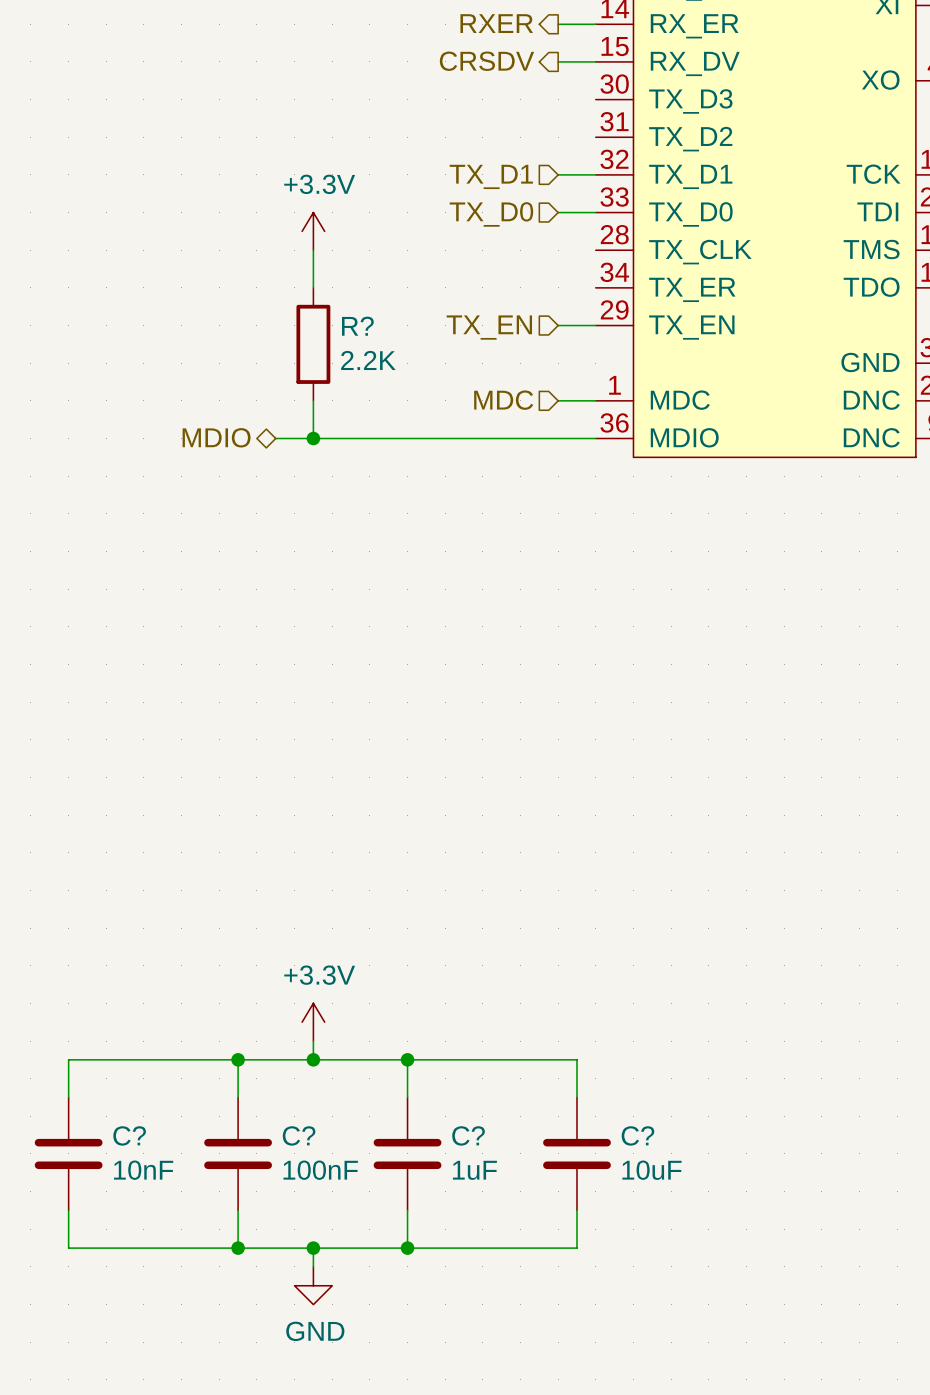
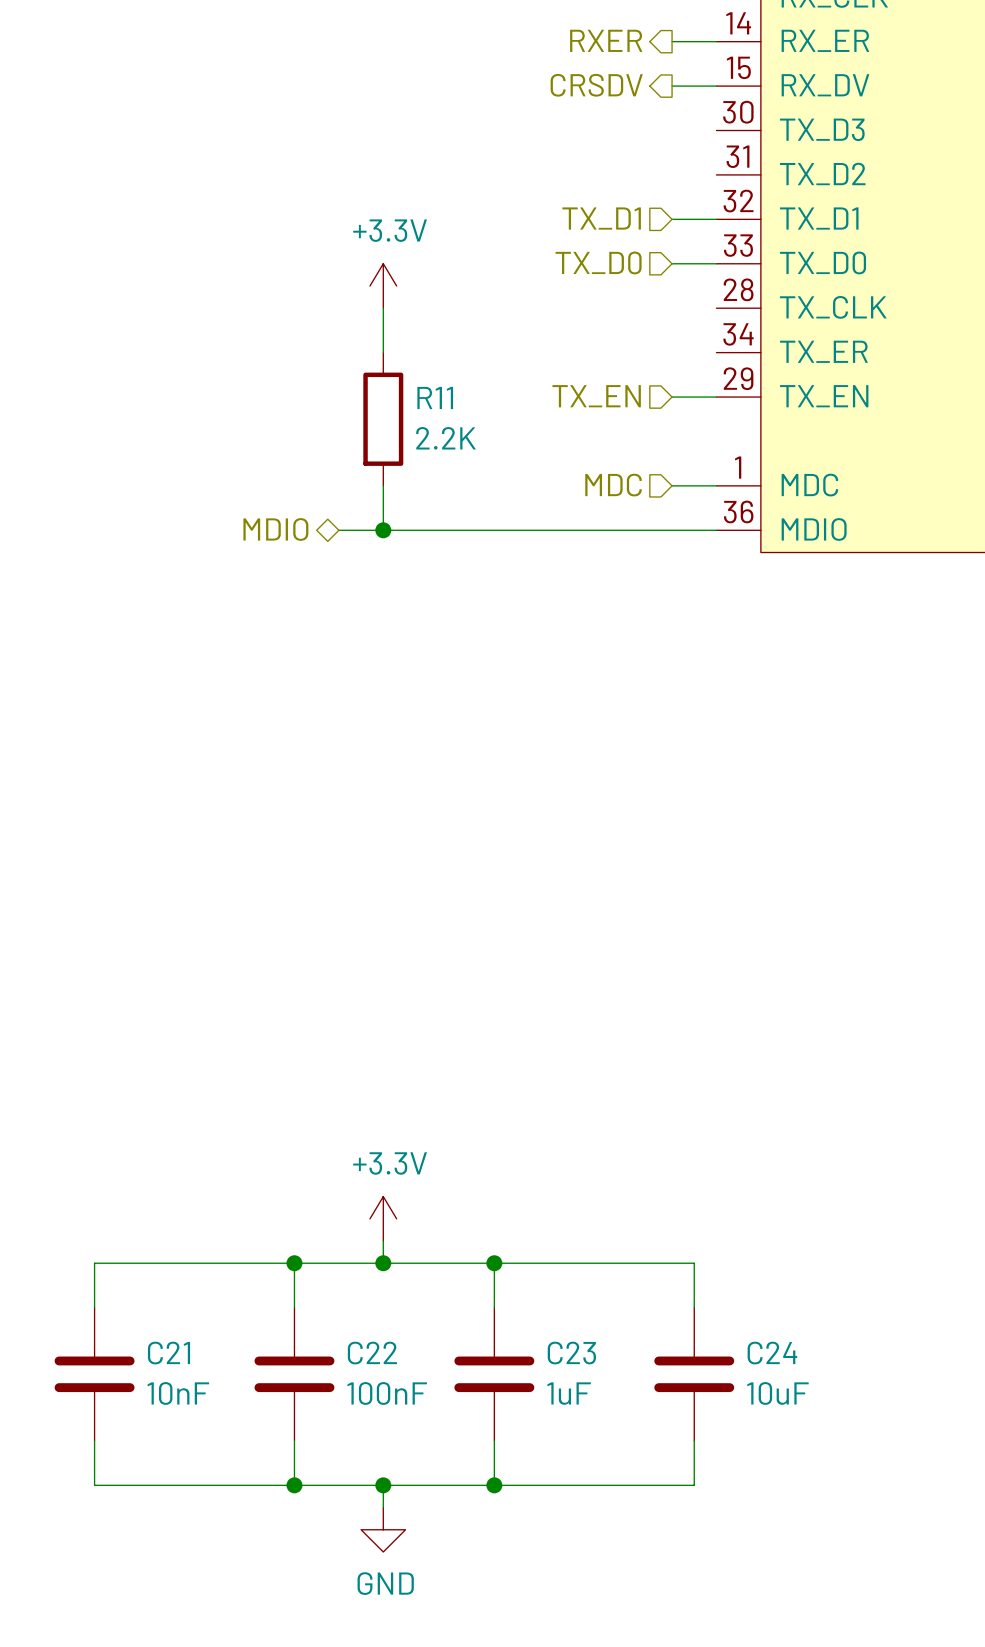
R? name: R? (357, 326) -> R11 (435, 397)
C? name: C? (129, 1135) -> C21 (169, 1353)
C? name: C? (299, 1135) -> C22 (372, 1353)
C? name: C? (468, 1135) -> C23 (571, 1353)
C? name: C? (637, 1135) -> C24 (772, 1353)

